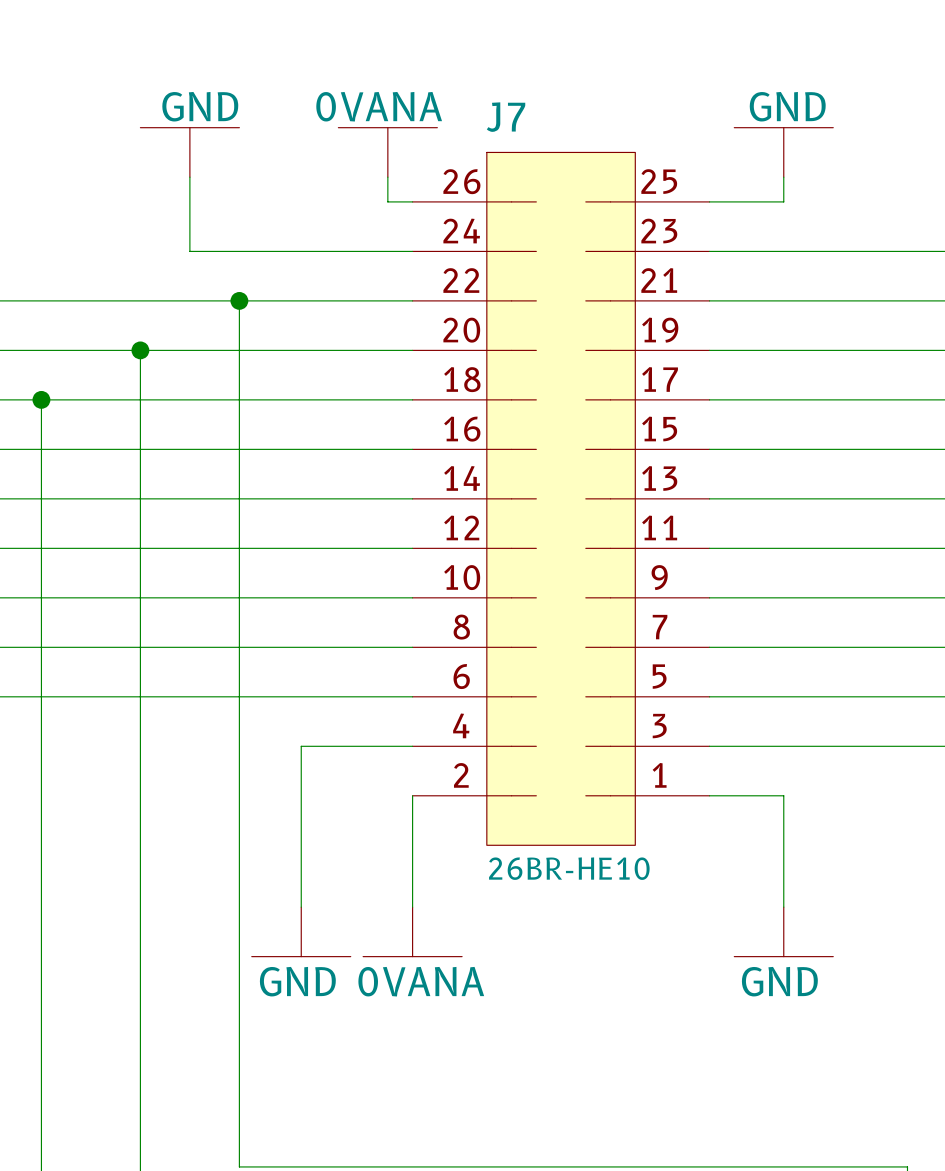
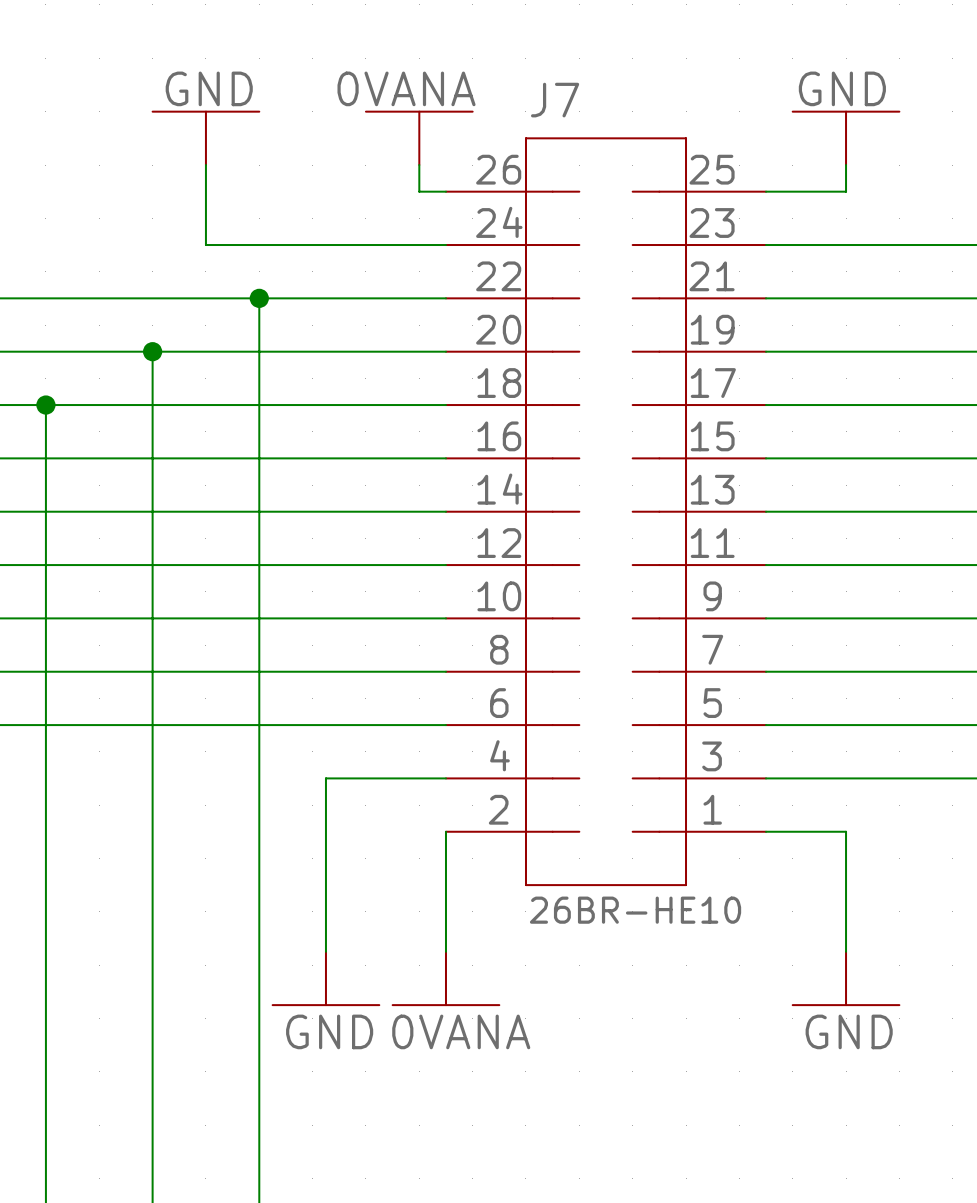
J7 symbol: [412, 152, 710, 846] -> [445, 138, 767, 886]

